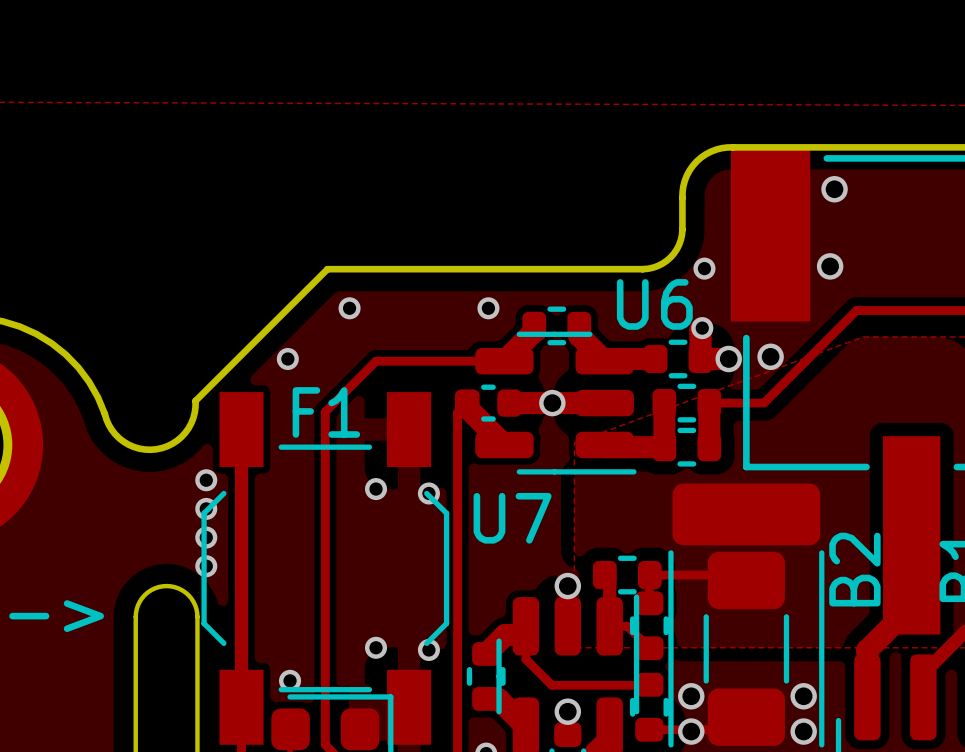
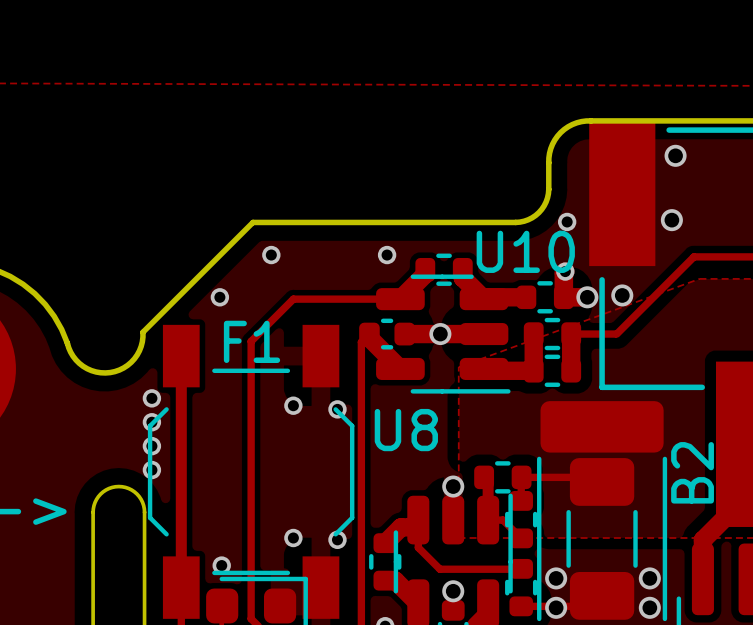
U6 name: U6 (654, 304) -> U10 (525, 251)
U7 name: U7 (512, 518) -> U8 (406, 430)

